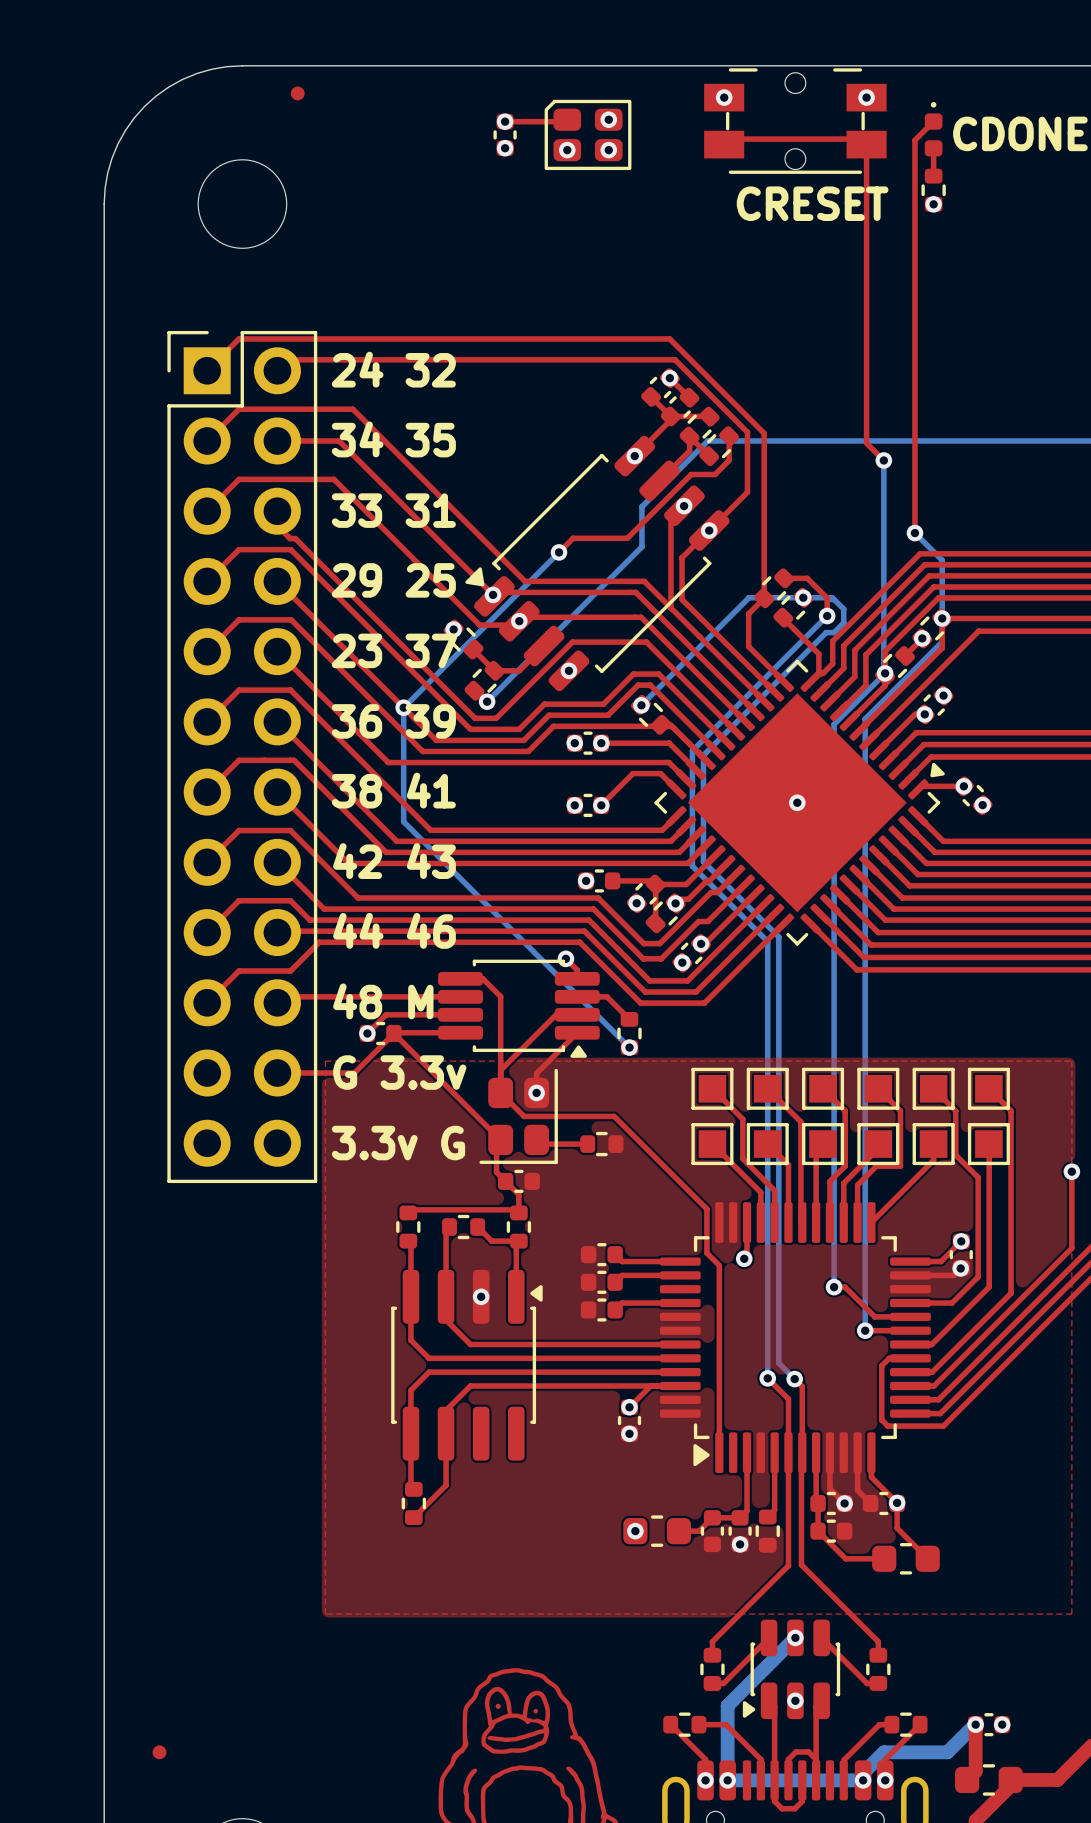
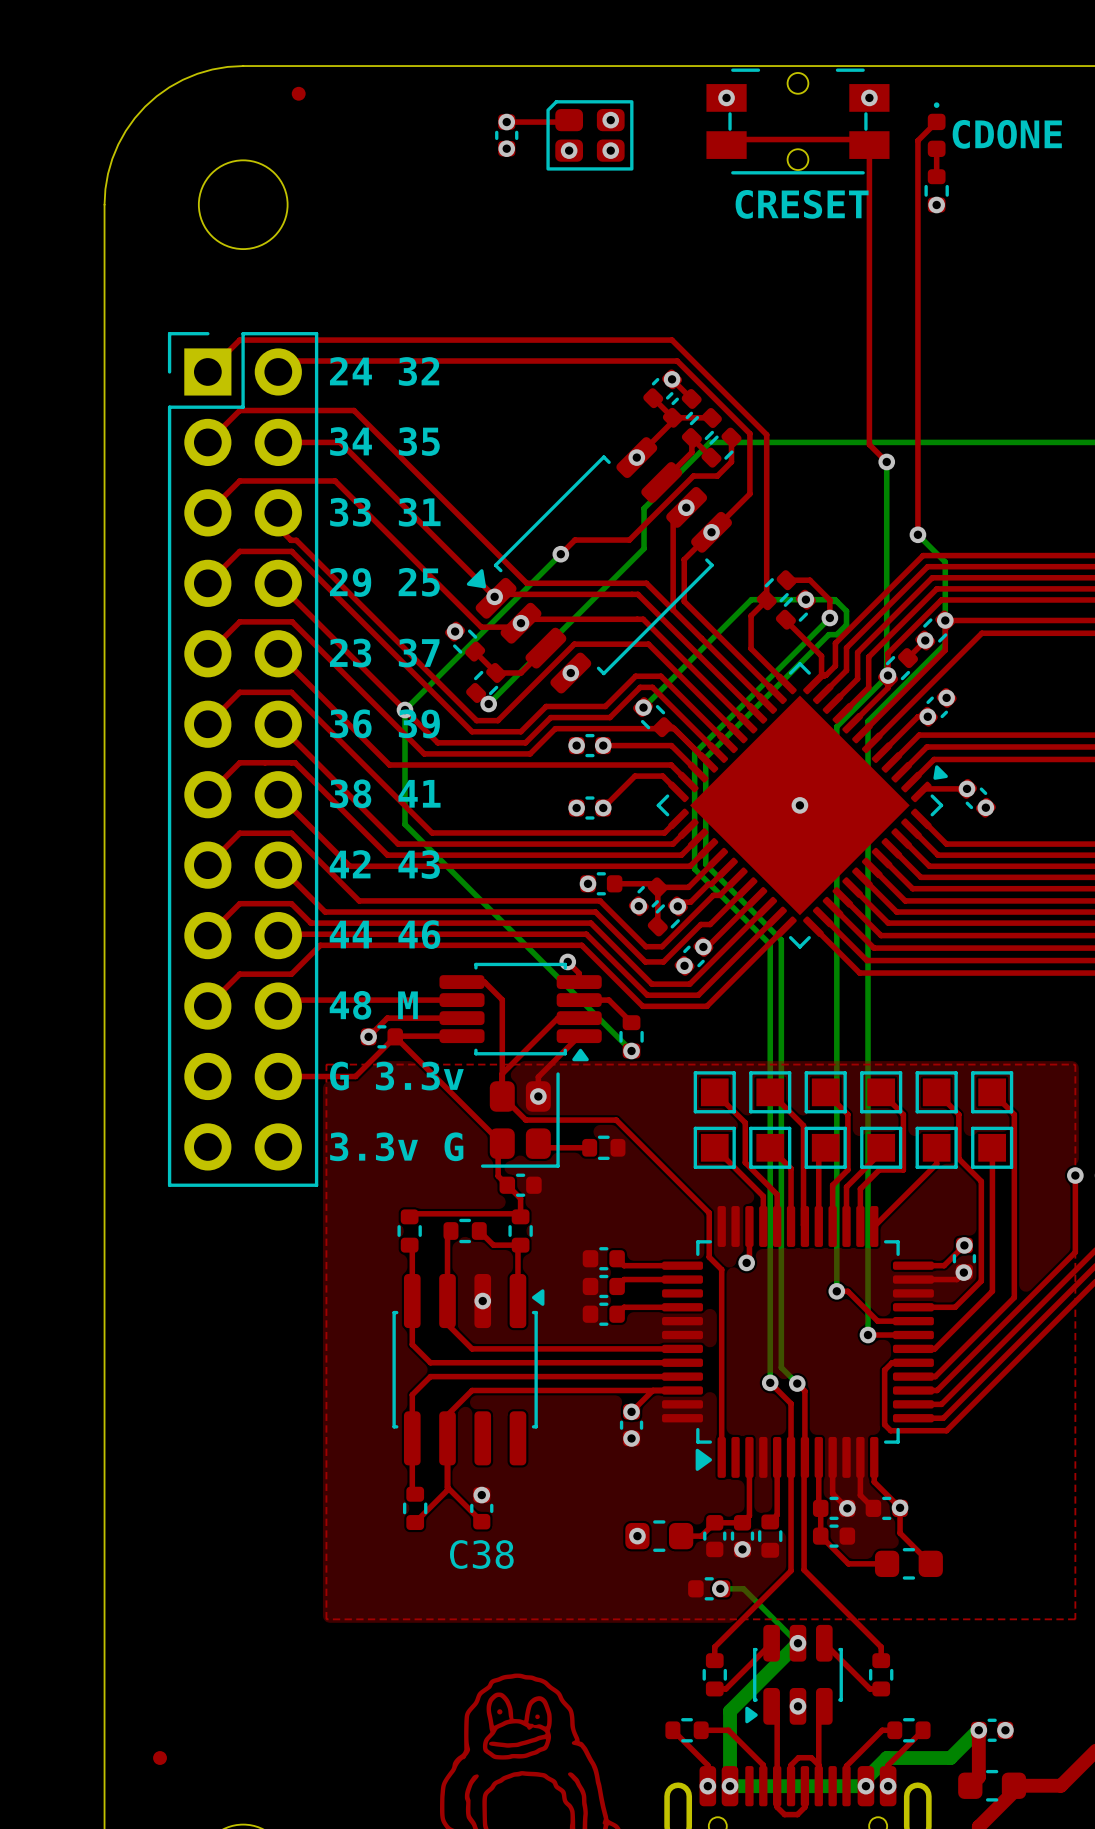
top track: none -> (447, 1487) (481, 1521)
via: none -> (481, 1495)
C38: none -> (481, 1508)
part: none -> (709, 1588)
bottom track: none -> (720, 1588) (743, 1588) (797, 1643)
via: none -> (720, 1588)

